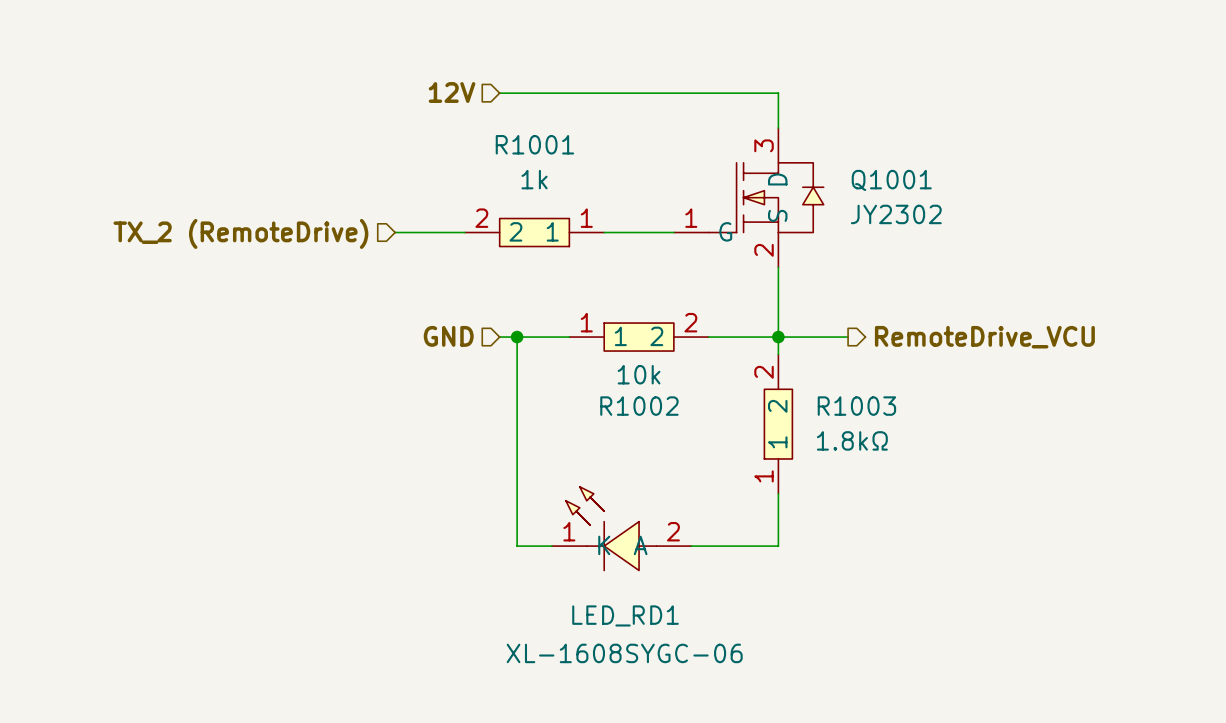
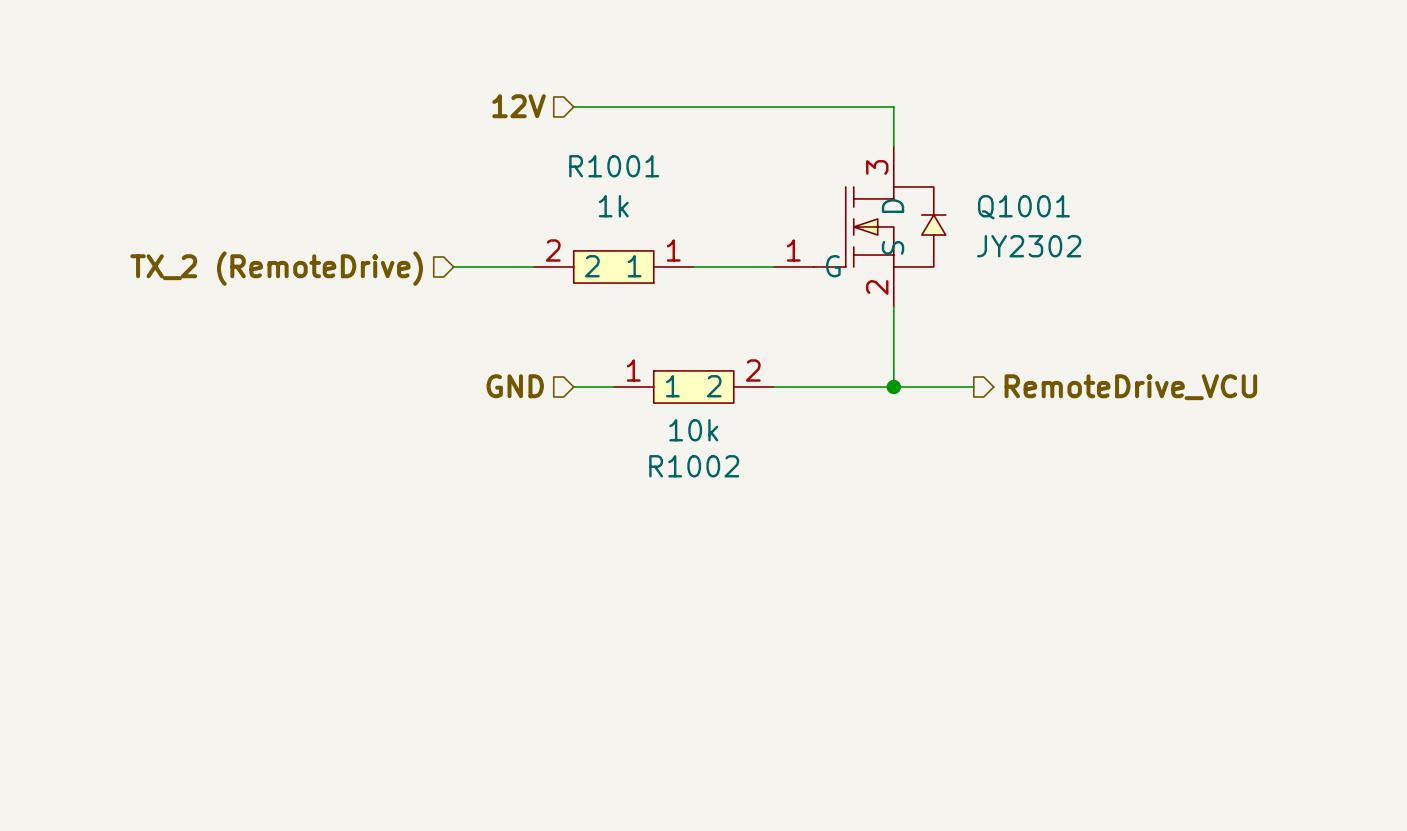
wire: (517, 337) (517, 546) (551, 546) -> none
junction: (517, 337) -> none
R1002 position: (639, 337) -> (693, 386)
wire: (778, 337) (778, 354) -> none
R1003: 1.8kΩ (778, 424) -> none
wire: (778, 493) (778, 546) (691, 546) -> none
LED_RD1: XL-1608SYGC-06 (621, 528) -> none

